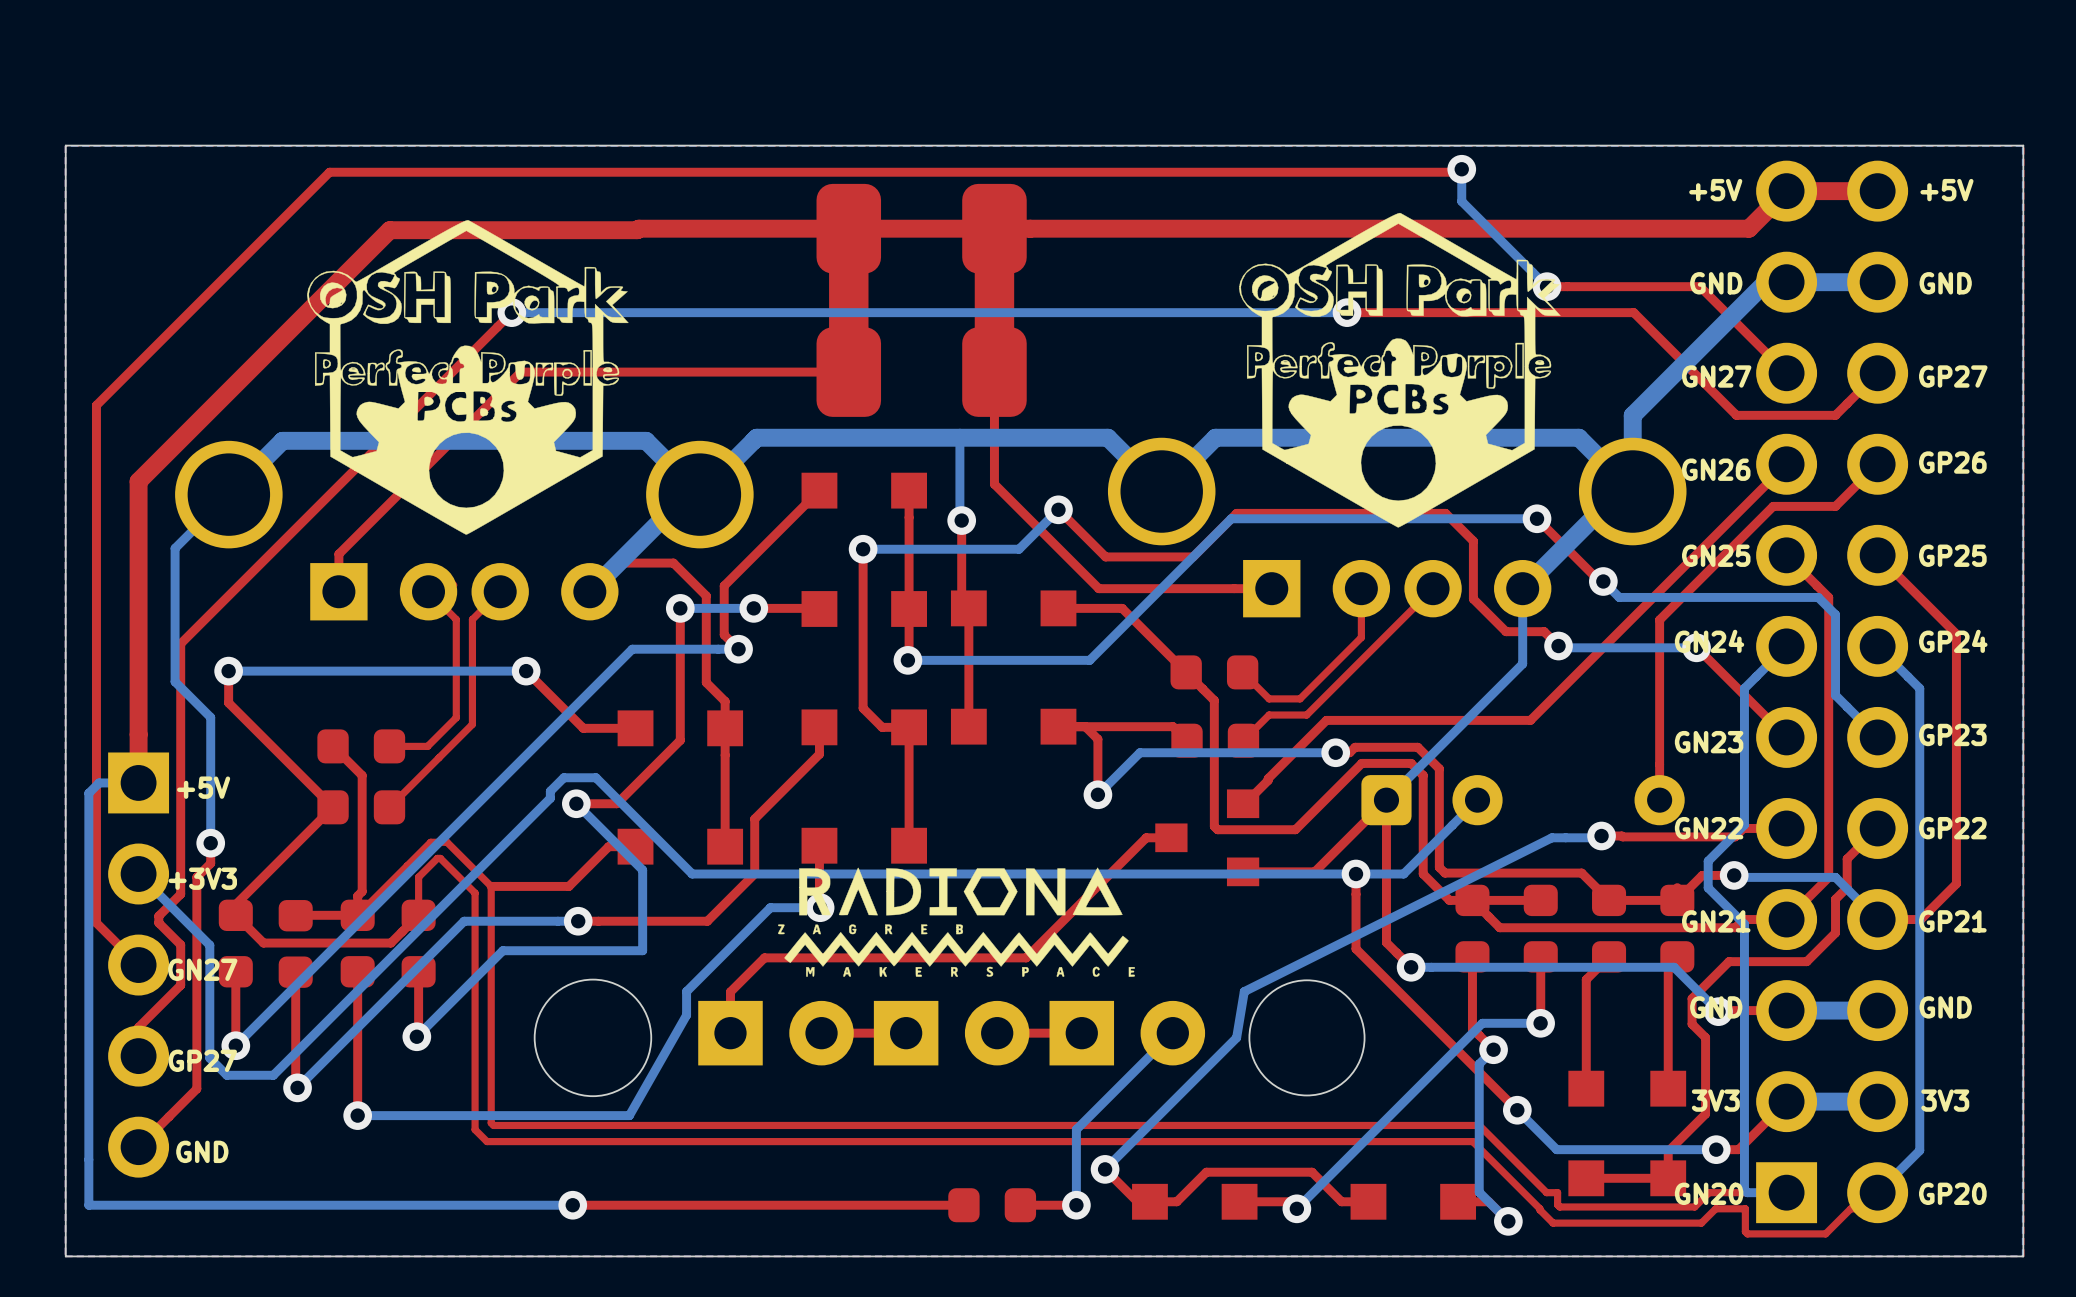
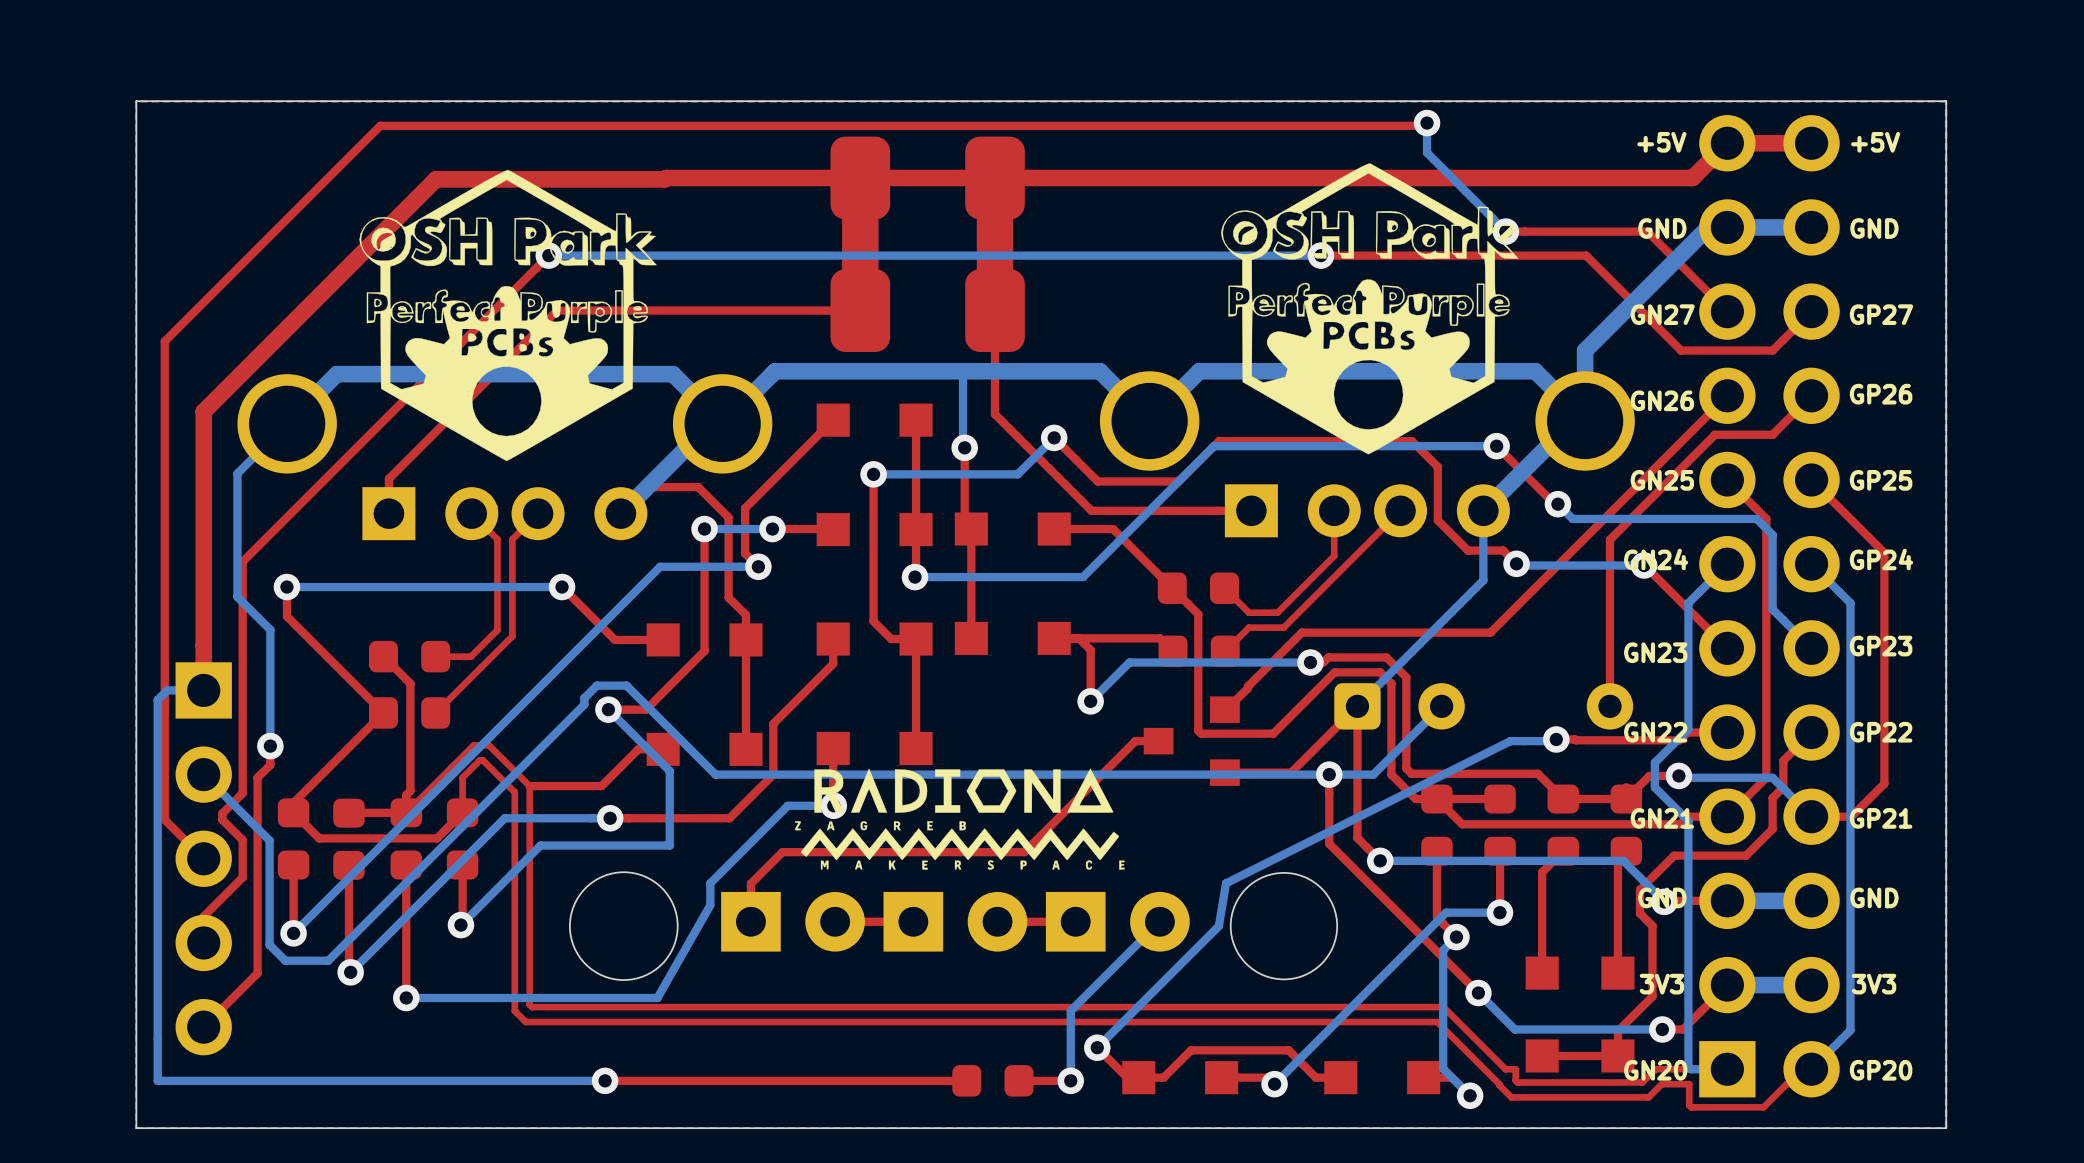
text: +5V (203, 787) -> none
text: +3V3 (202, 878) -> none
text: GN27 (202, 969) -> none
text: GP27 (202, 1060) -> none
text: GND (202, 1151) -> none

